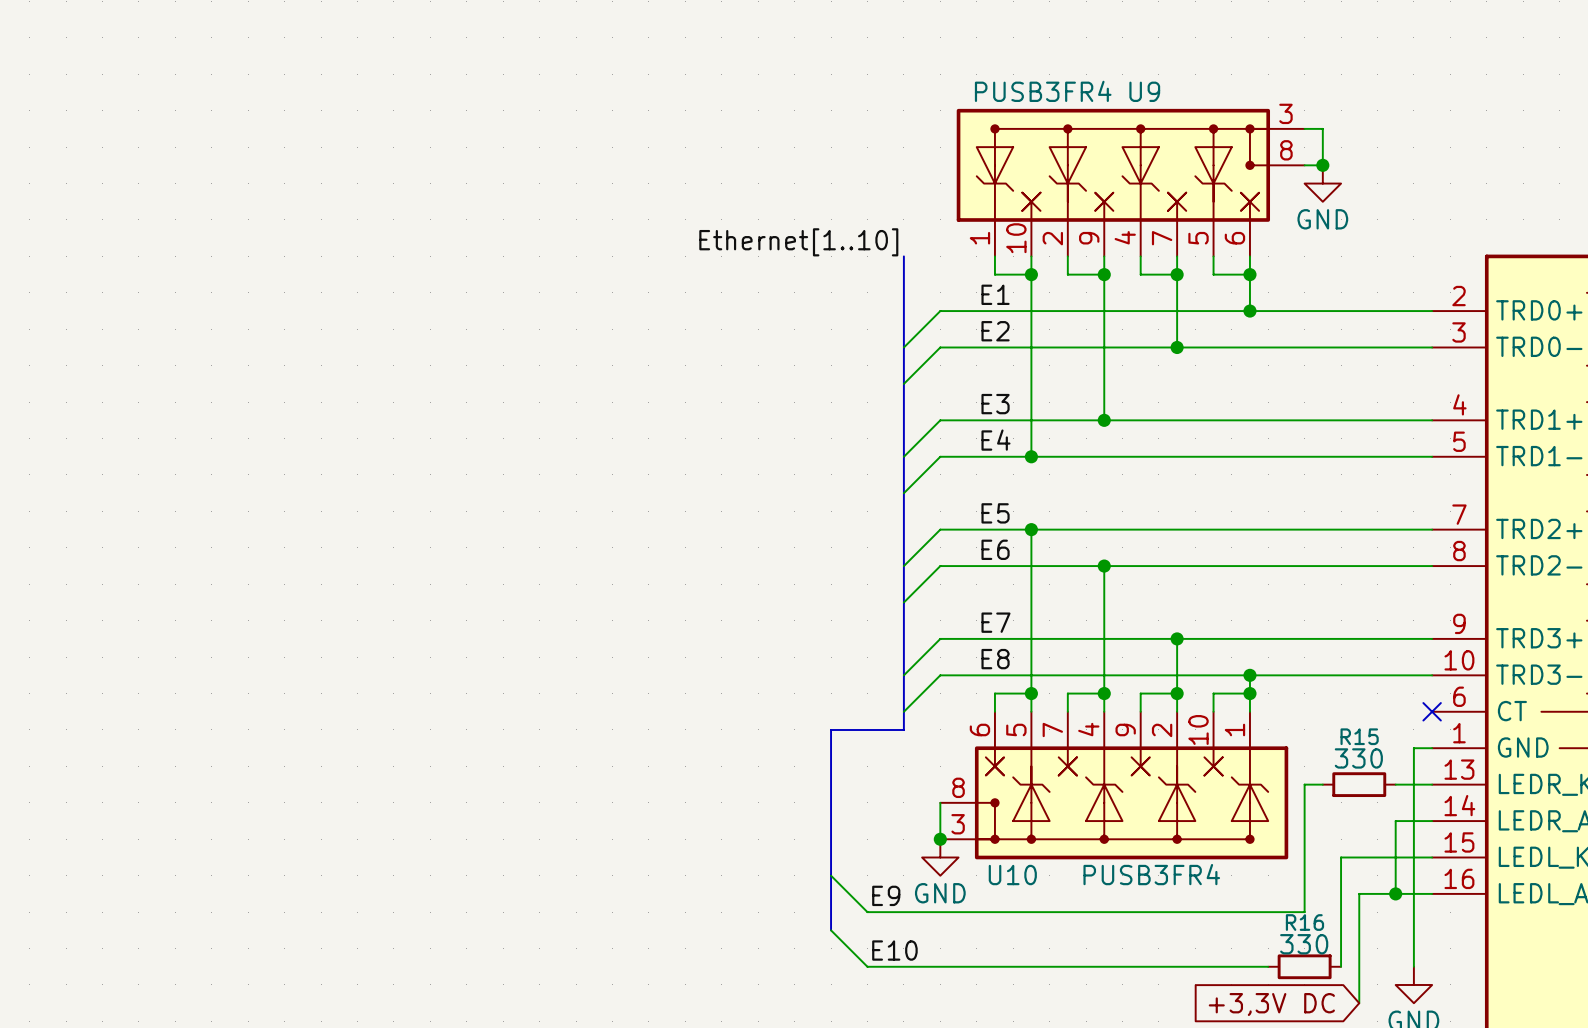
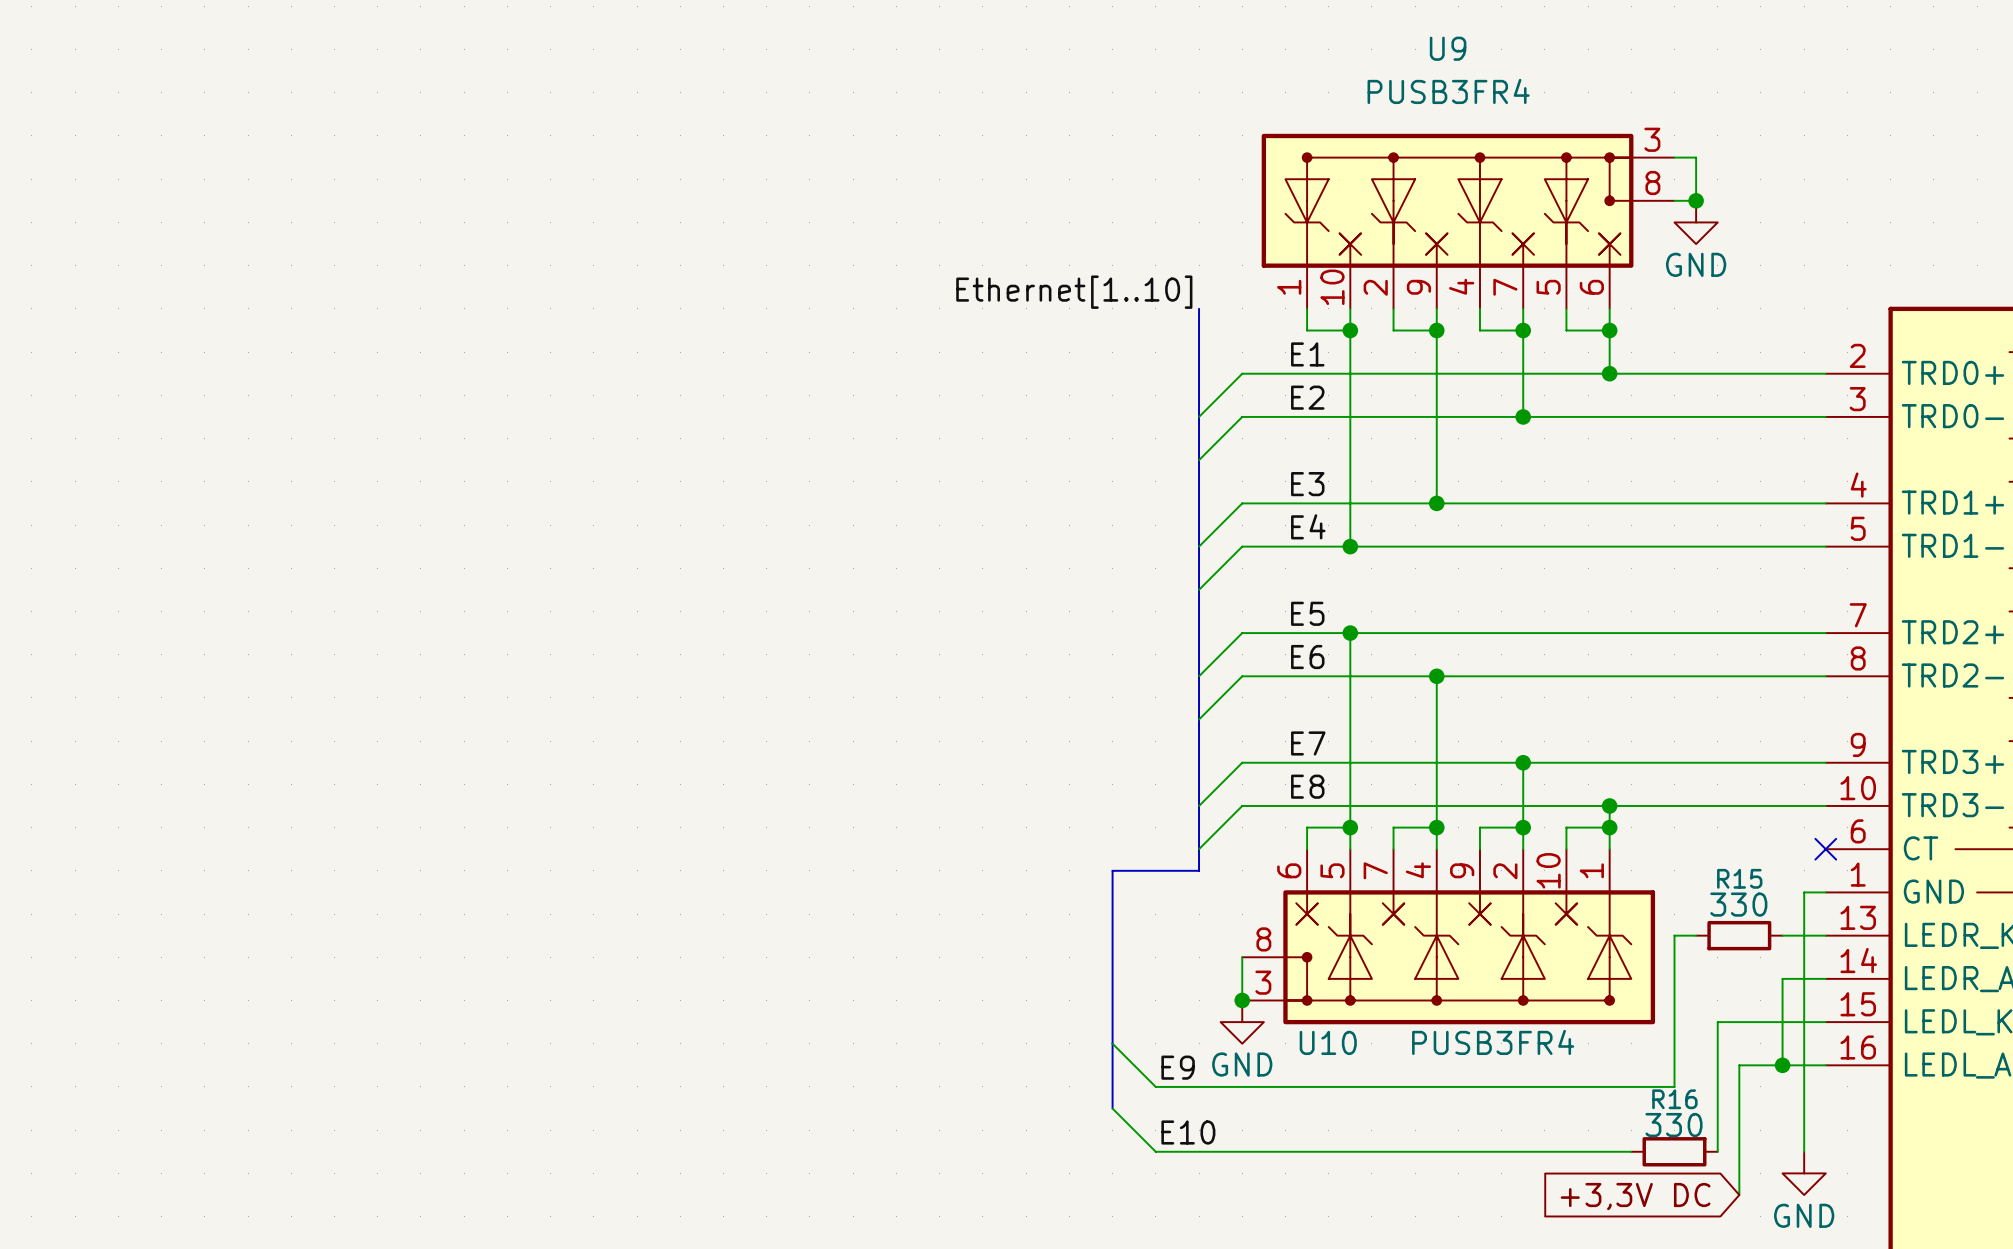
U9 value position: PUSB3FR4 (1043, 91) -> PUSB3FR4 (1448, 91)
U9 name position: U9 (1144, 91) -> U9 (1448, 48)

